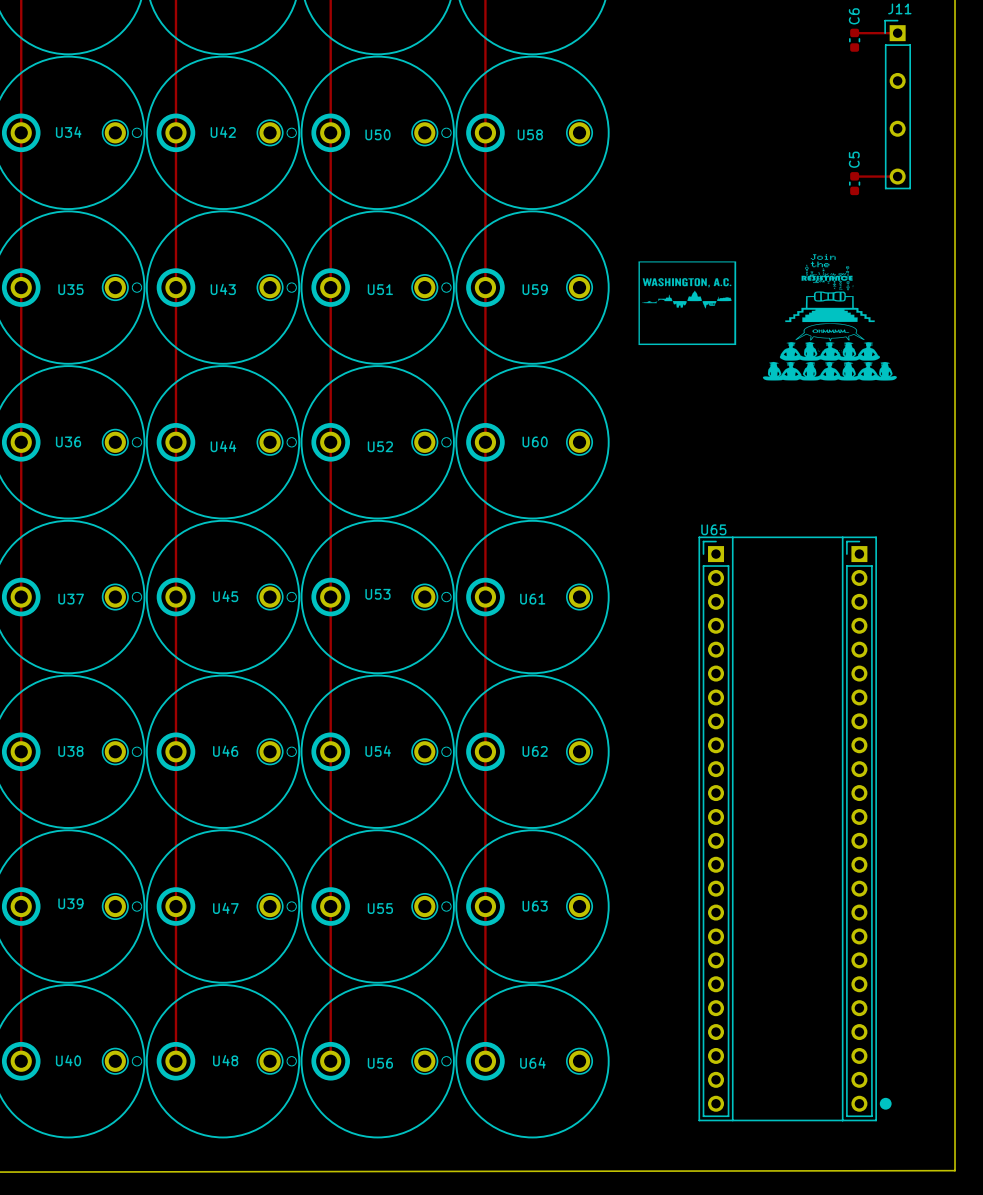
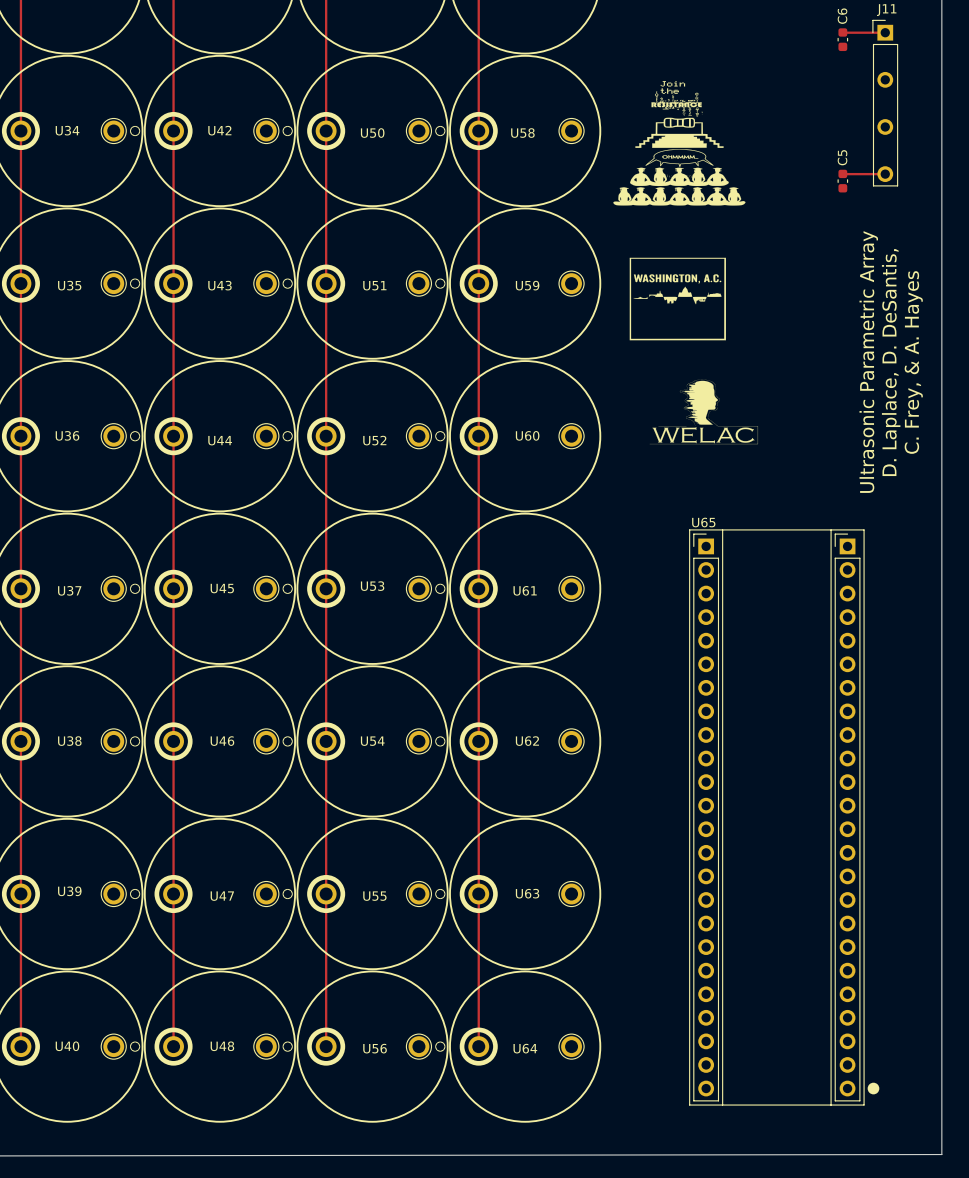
drawing position: (827, 272) -> (676, 98)
drawing position: (829, 336) -> (679, 161)
text: none -> Ultrasonic Parametric Array (868, 362)
text: none -> D. Laplace, D. DeSantis, (891, 362)
text: none -> C. Frey, & A. Hayes (913, 362)
drawing: none -> [649, 379, 759, 445]

